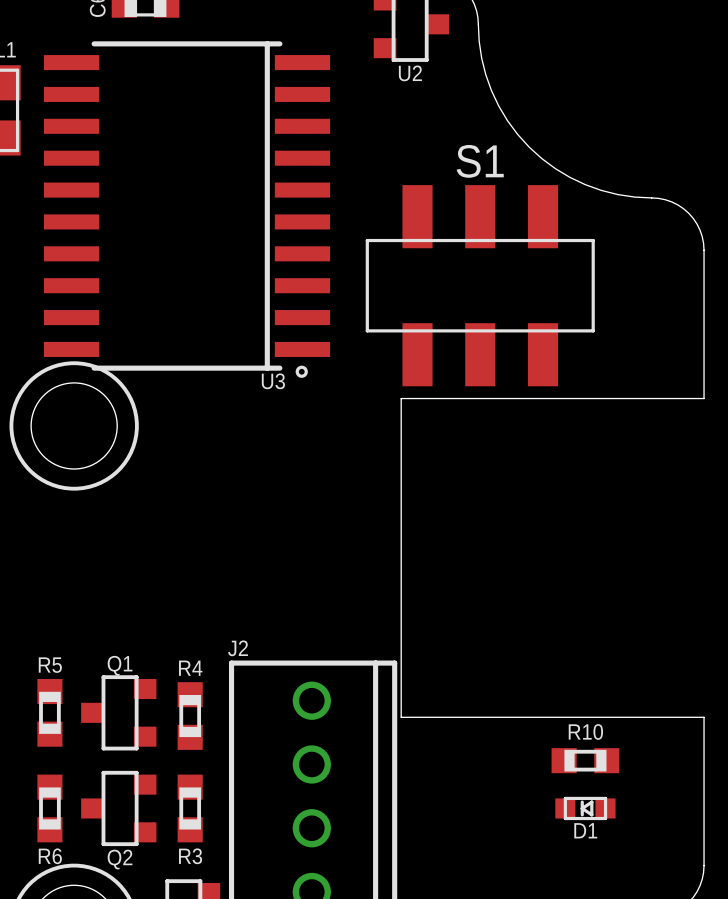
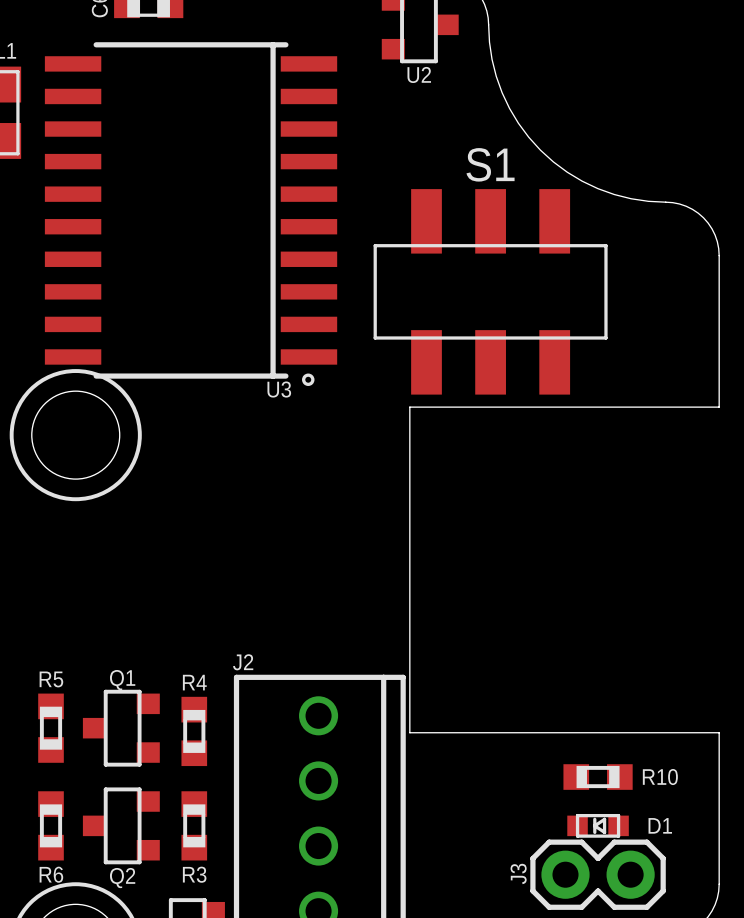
R10 name position: R10 (585, 731) -> R10 (660, 777)
D1 name position: D1 (585, 830) -> D1 (660, 825)
J3: none -> (598, 874)

